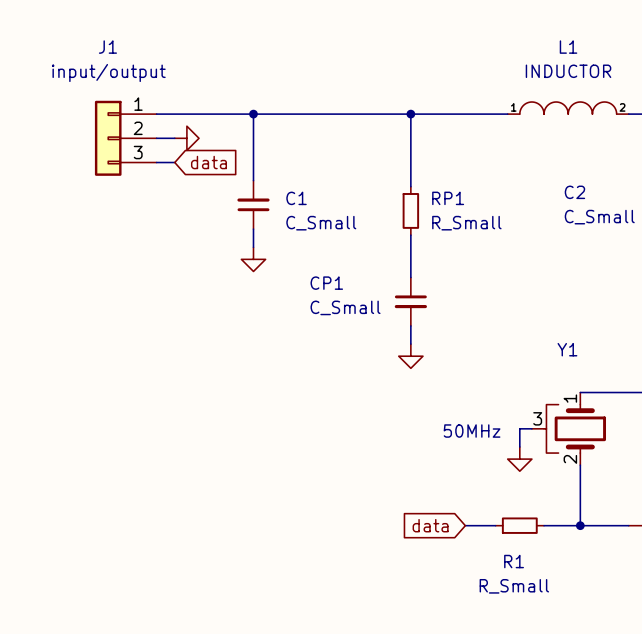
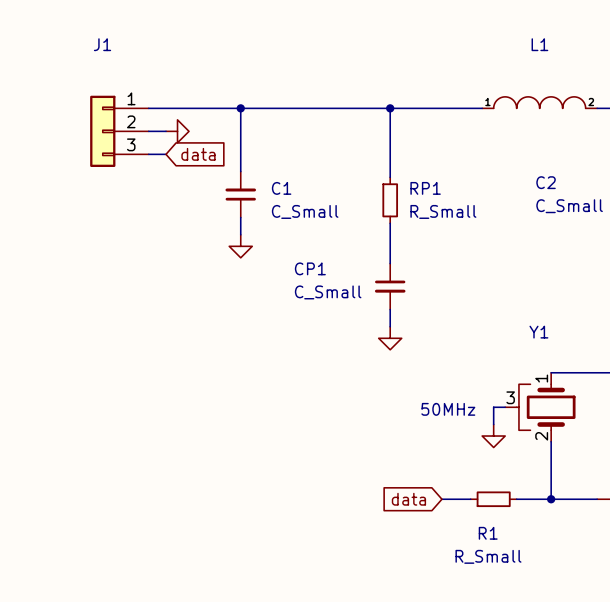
L1 value: INDUCTOR (568, 71) -> none
J1 value: input/output (108, 73) -> none

